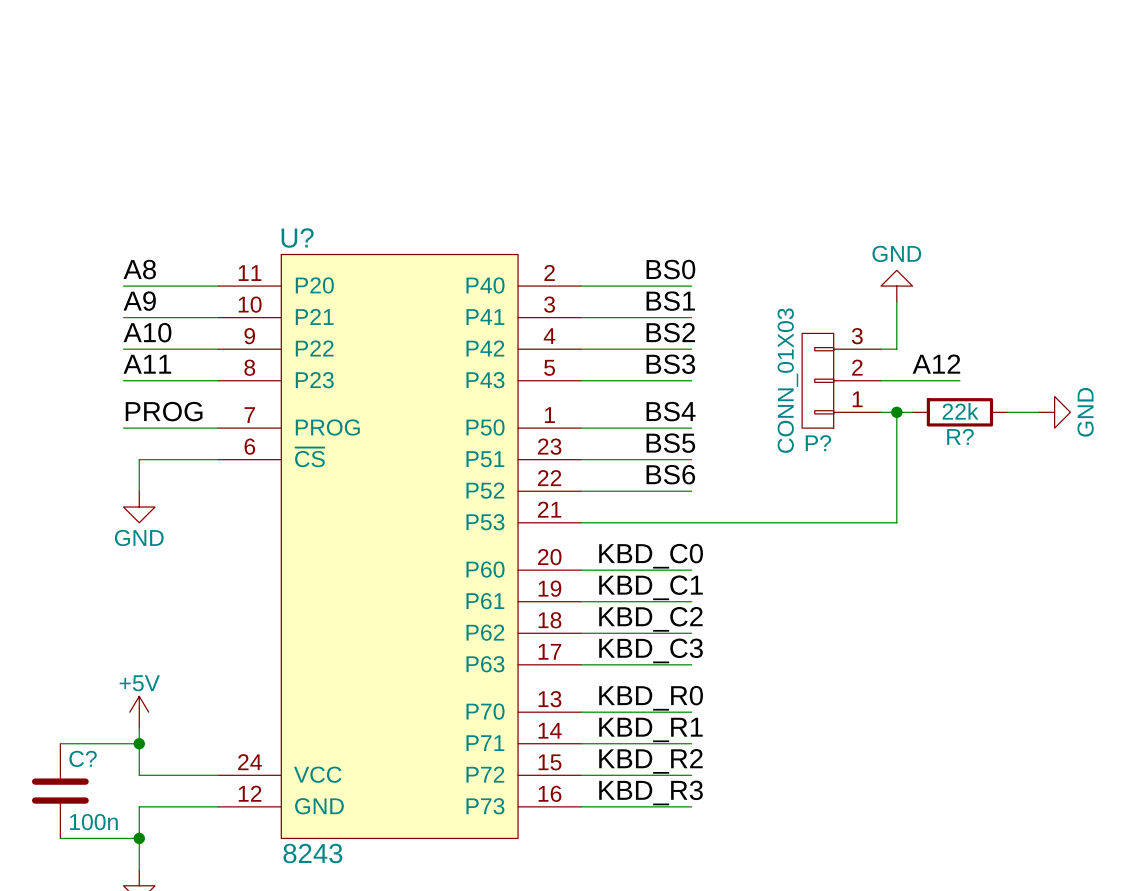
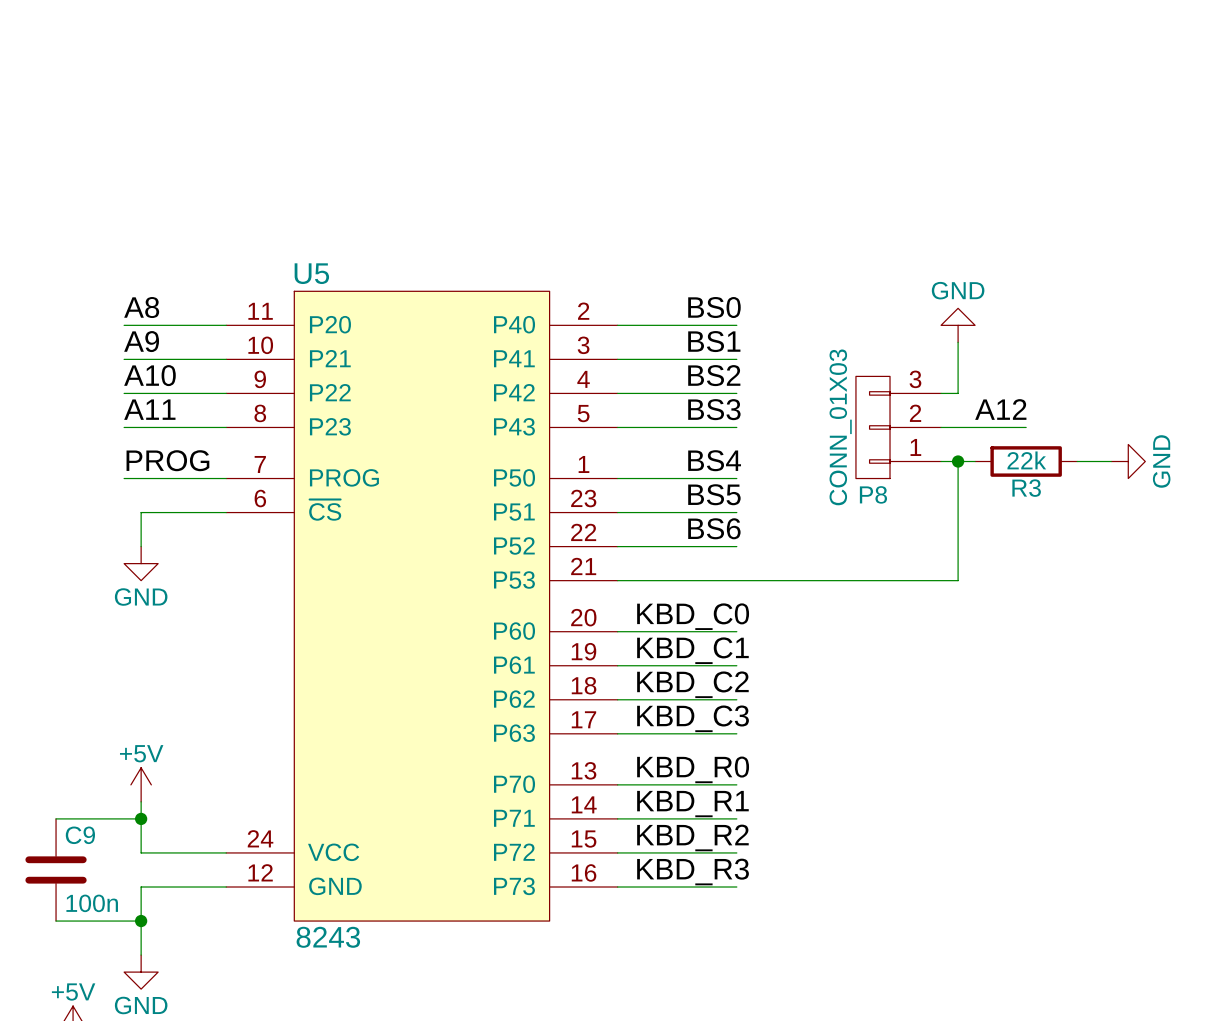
U? name: U? (297, 238) -> U5 (311, 273)
R? name: R? (960, 436) -> R3 (1026, 488)
P? name: P? (818, 443) -> P8 (873, 494)
C? name: C? (83, 758) -> C9 (80, 835)

